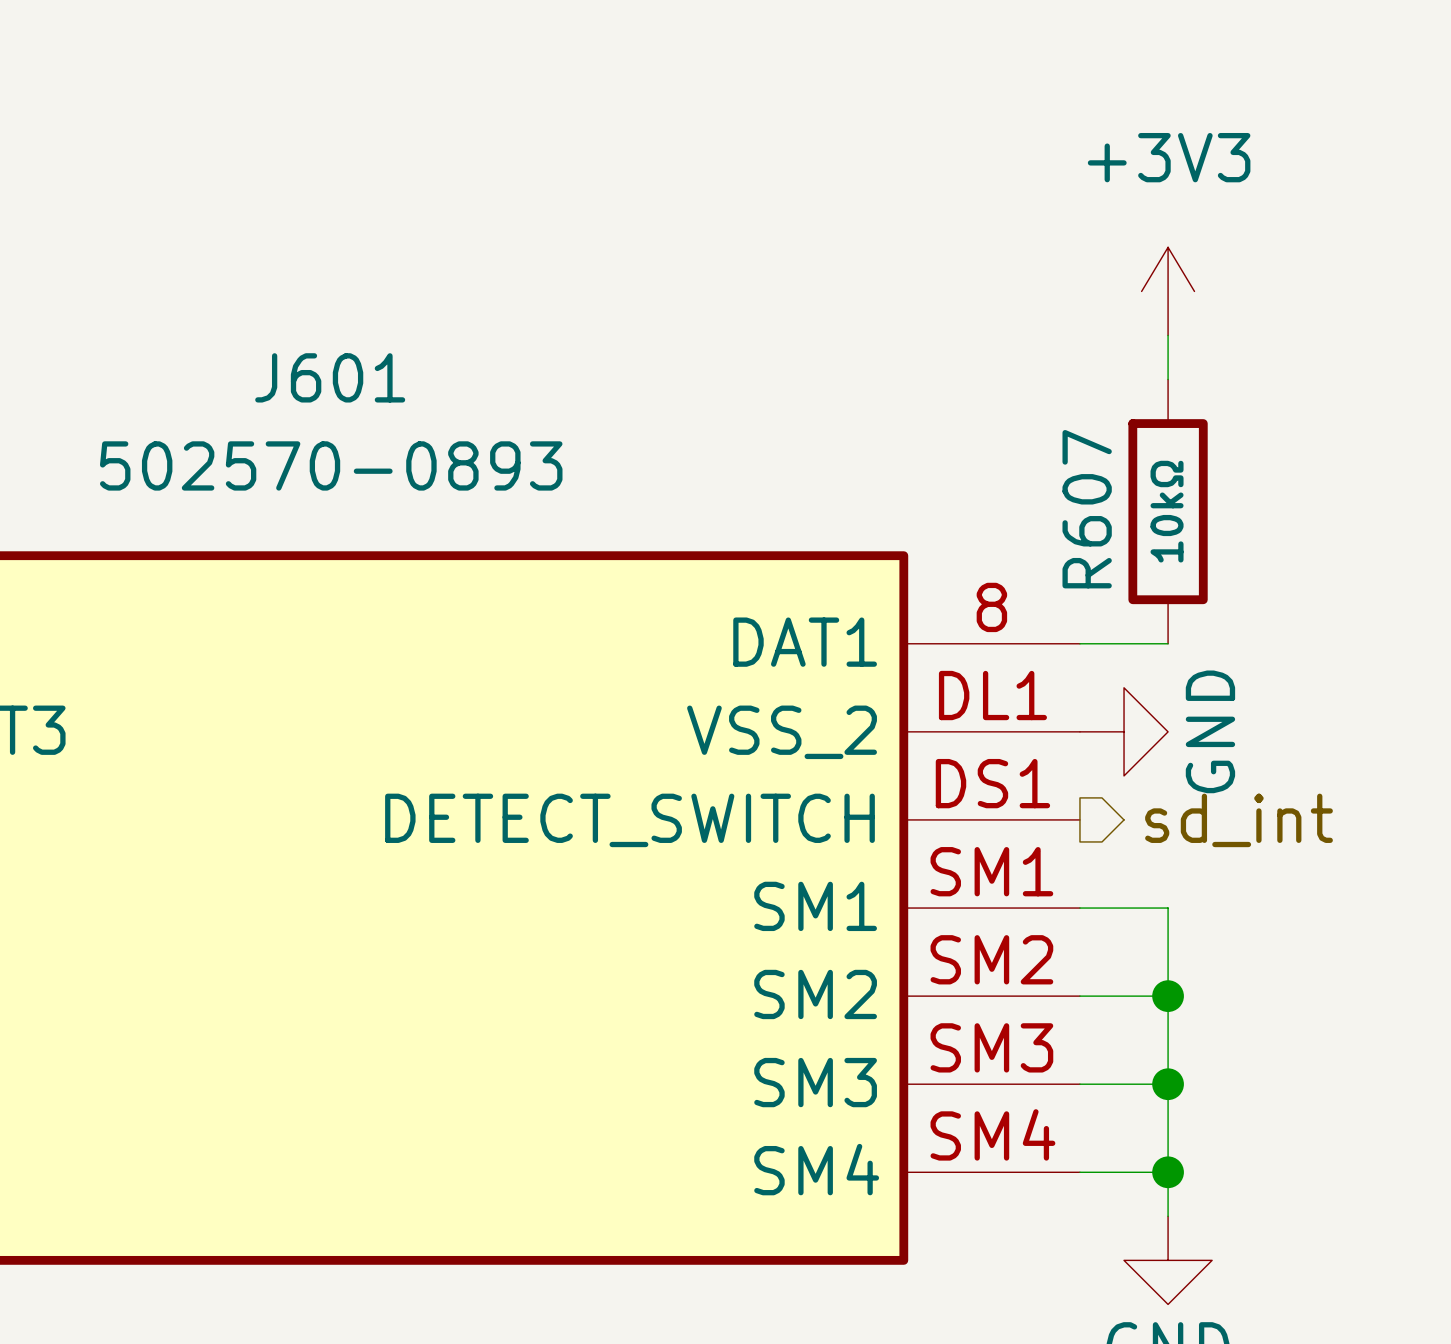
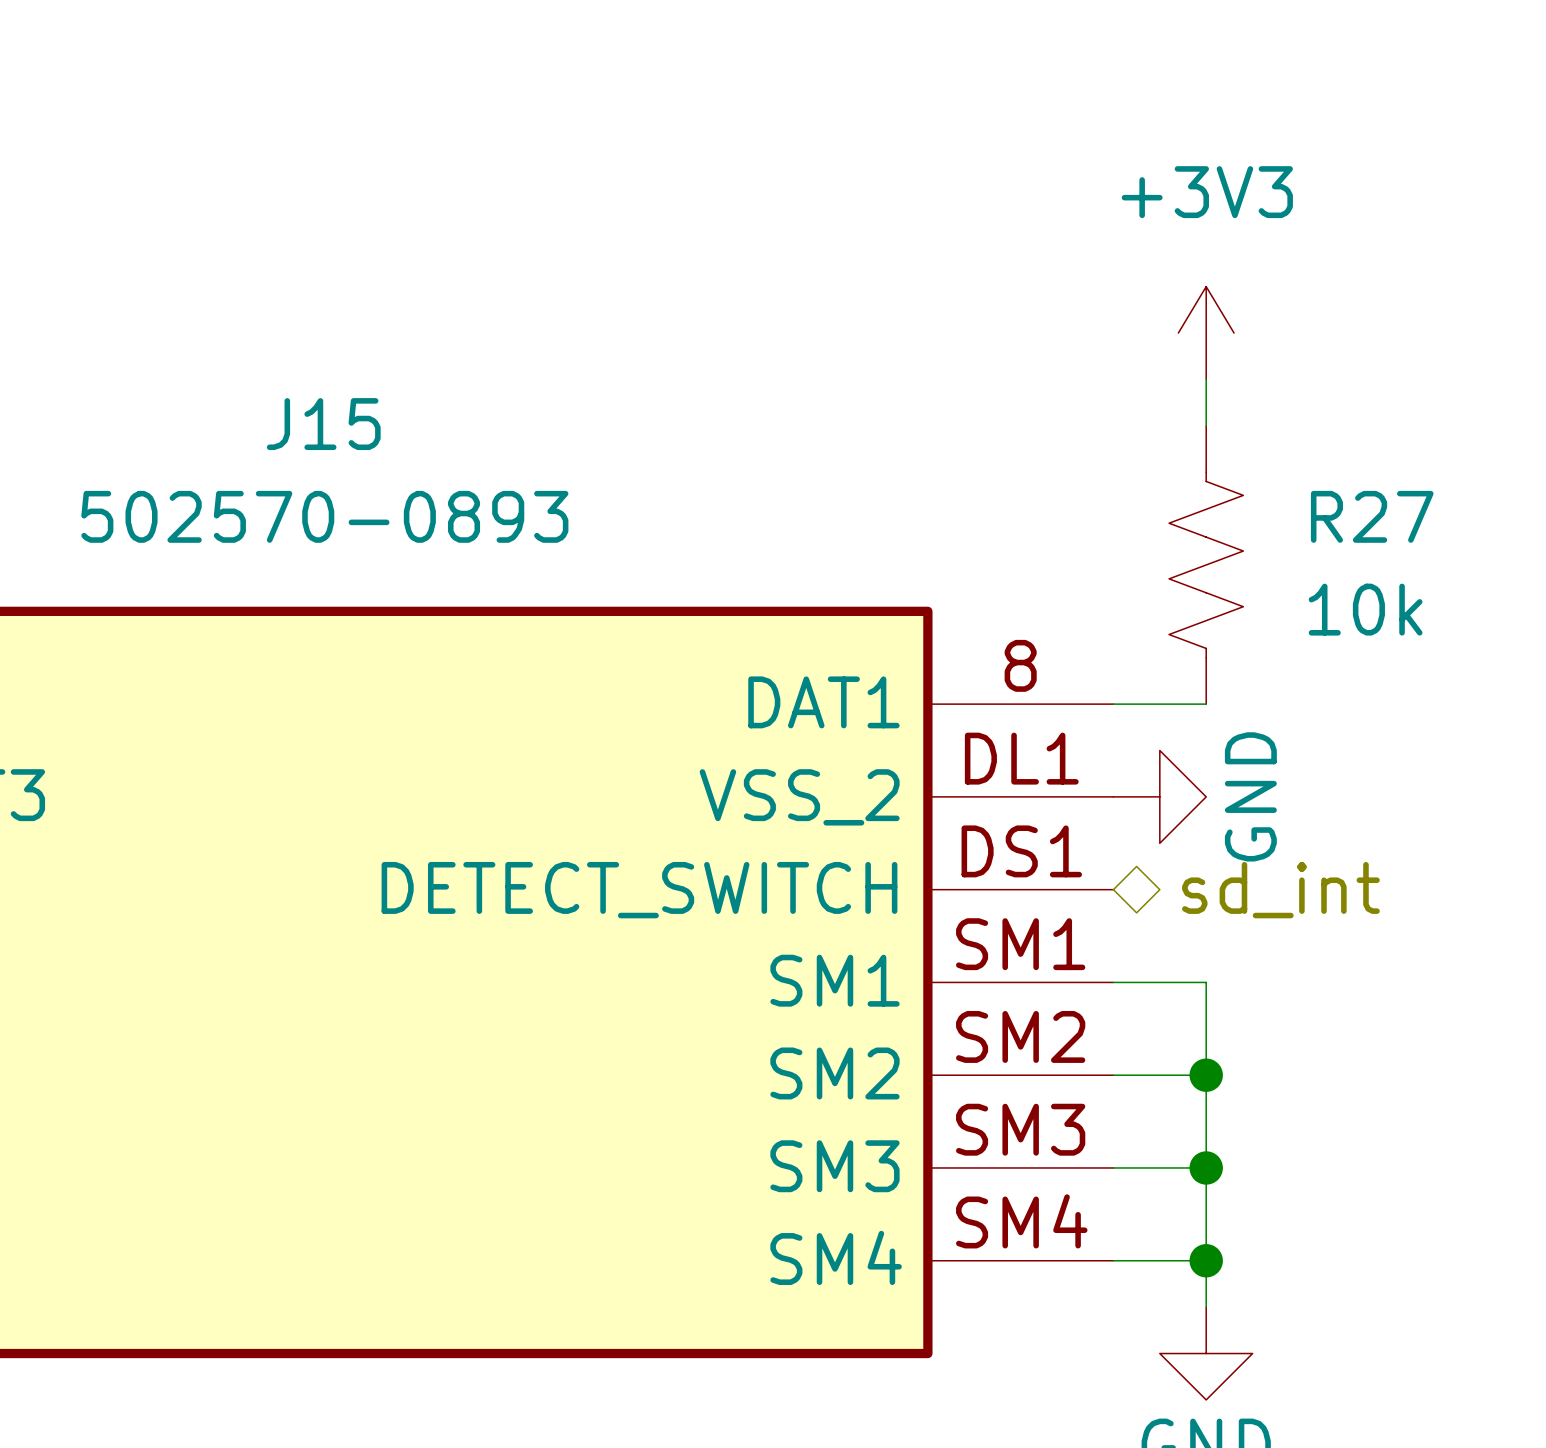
J601 name: J601 (330, 377) -> J15 (323, 424)
R607: 10kΩ (1168, 511) -> none
R27: none -> 10k (1206, 564)
hierarchical label shape: output (1239, 820) -> bidirectional (1280, 890)

